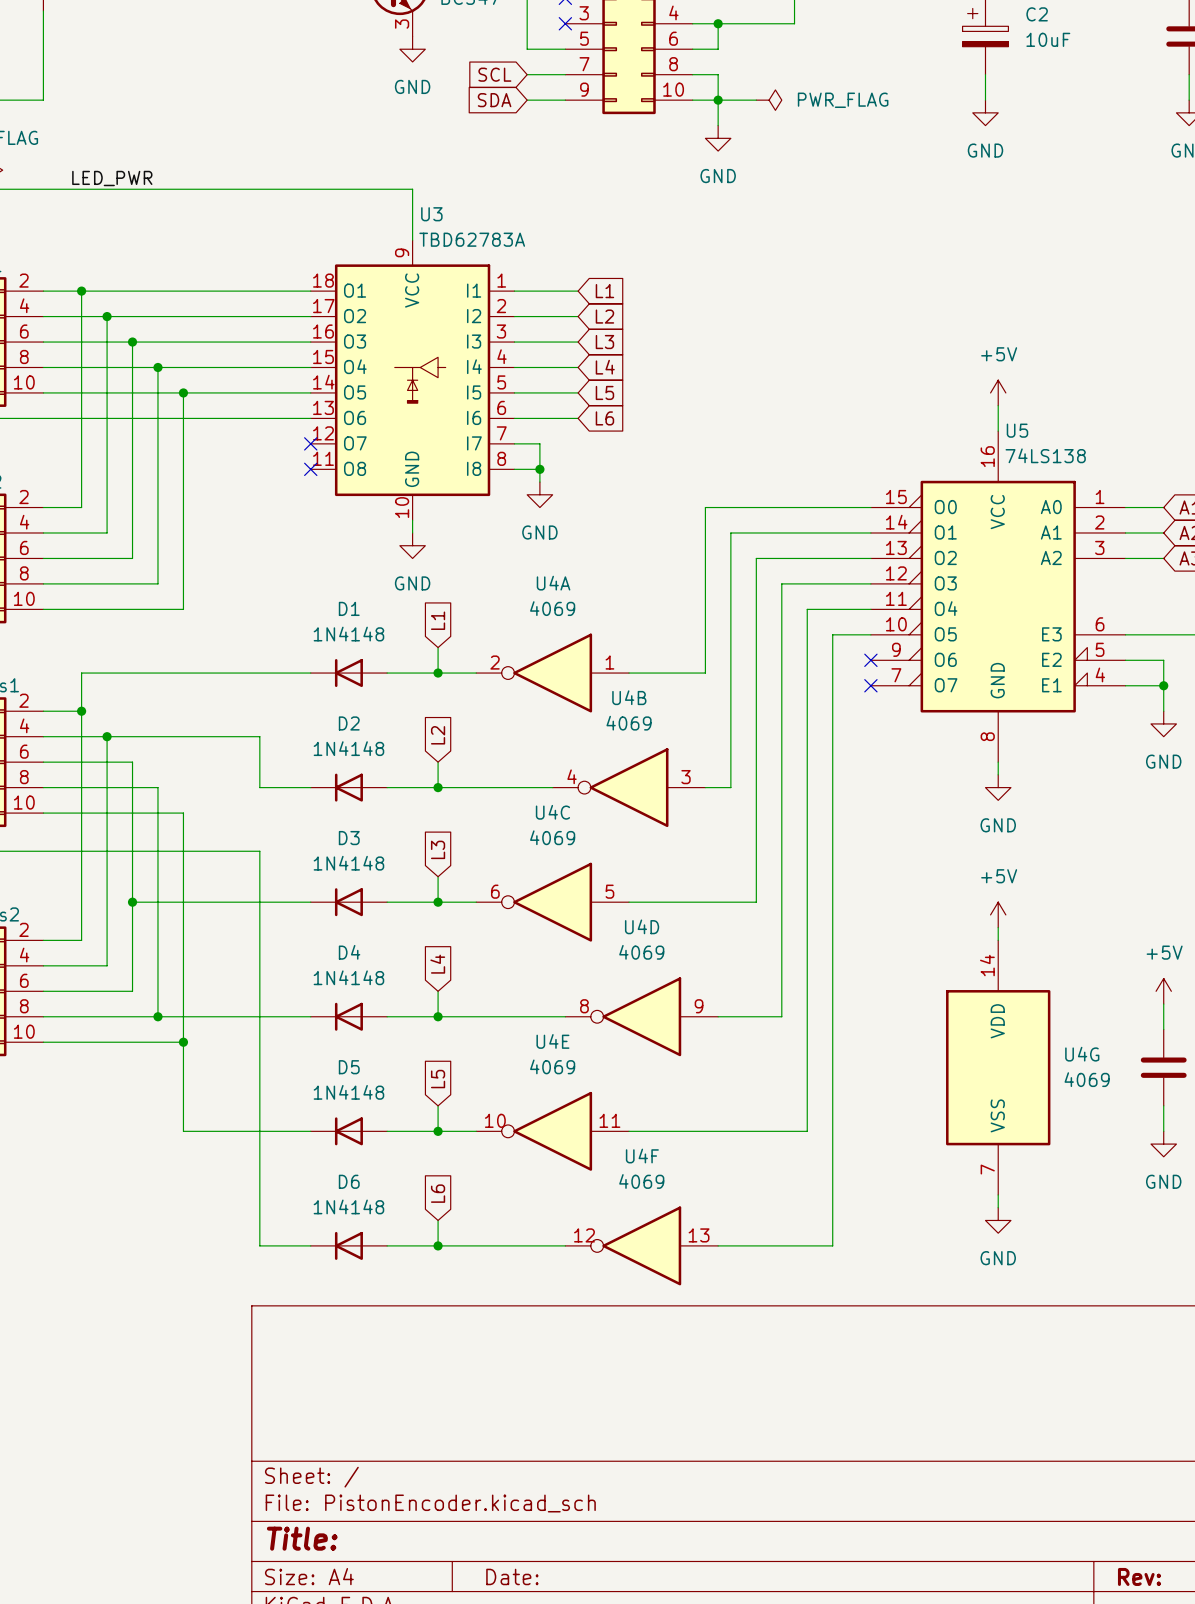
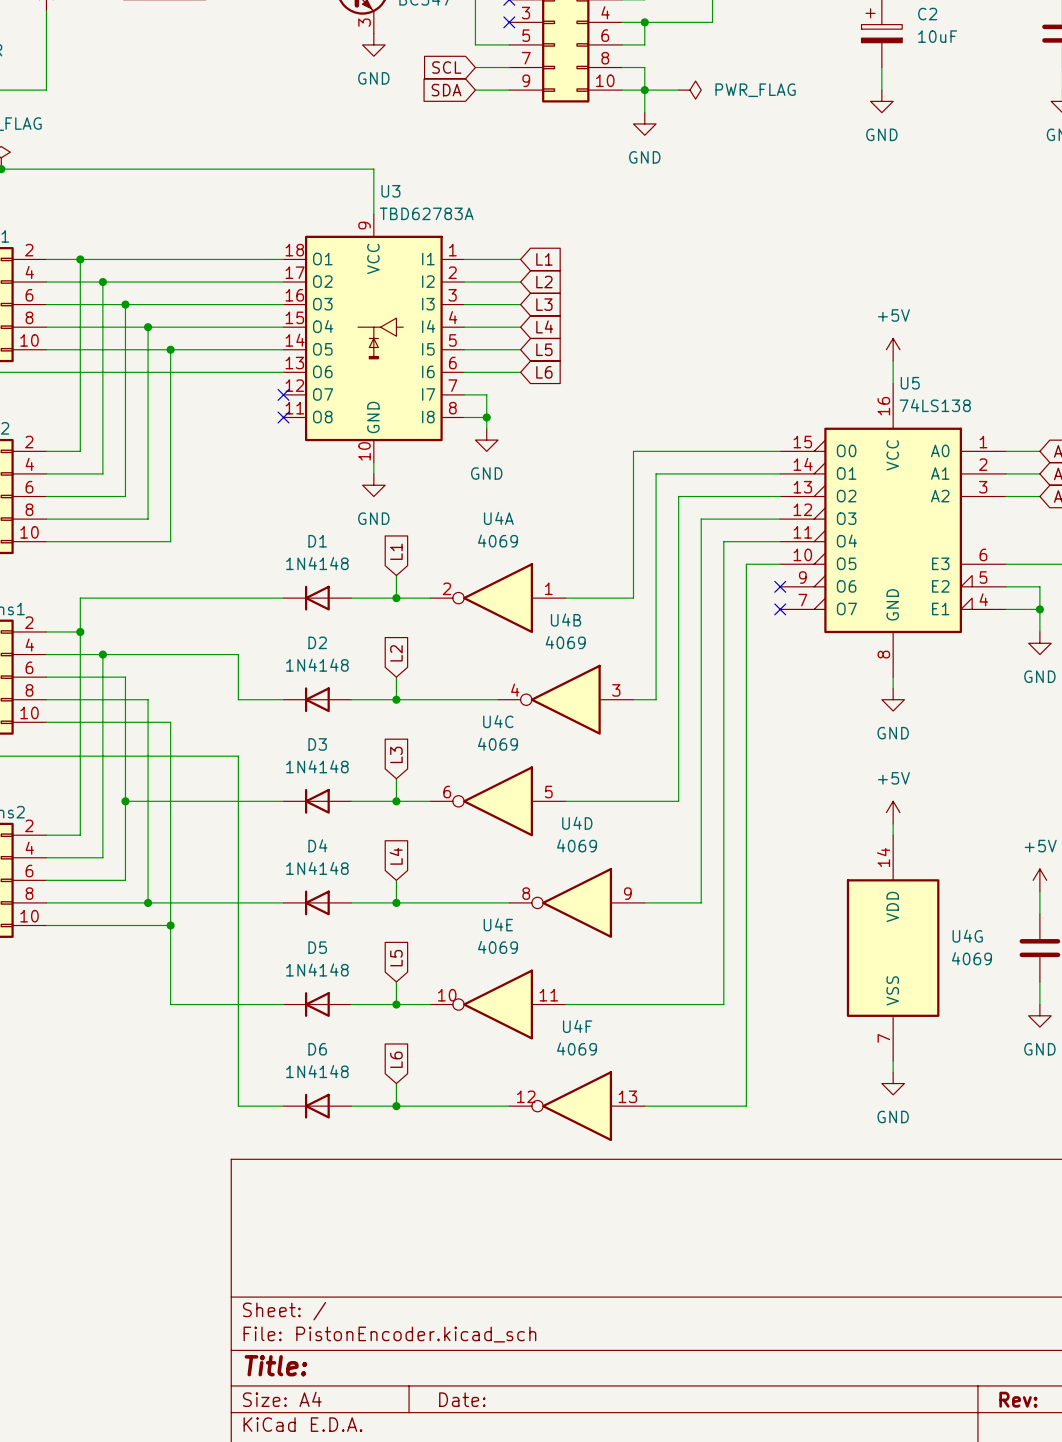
label: LED_PWR (112, 178) -> none

